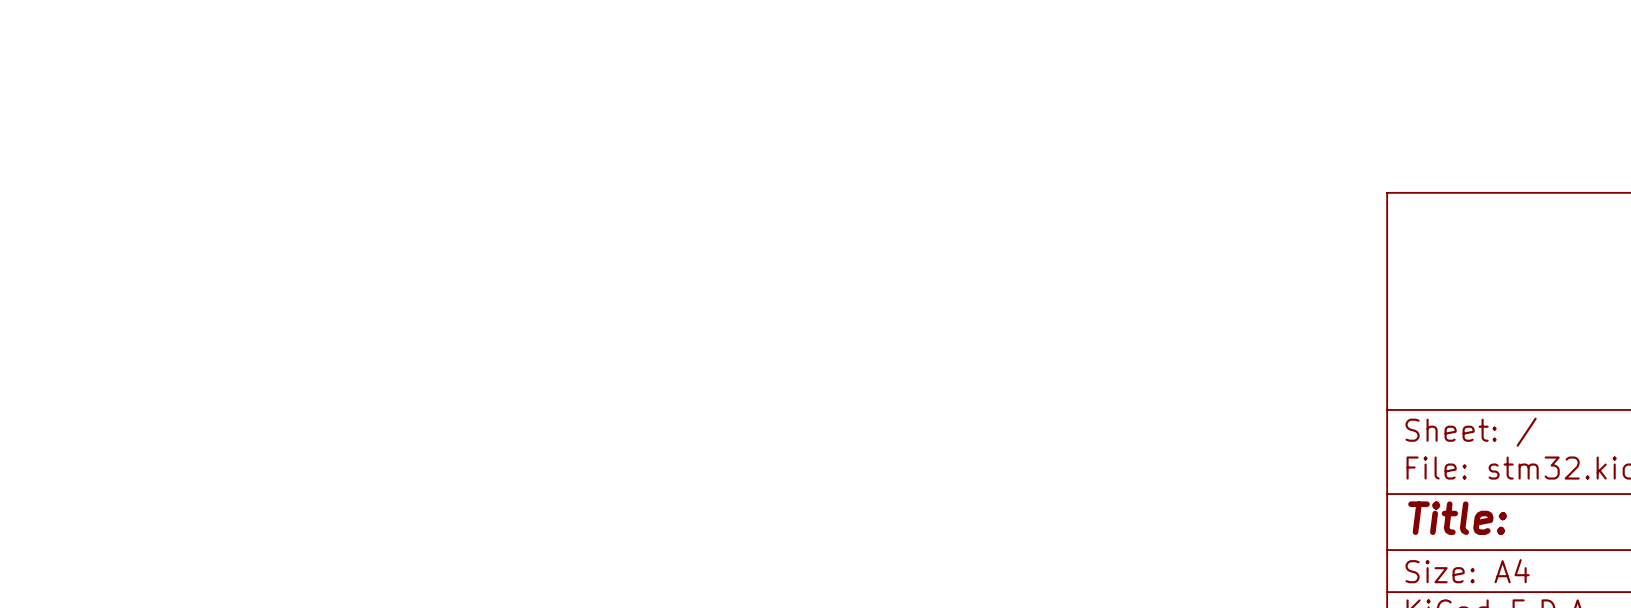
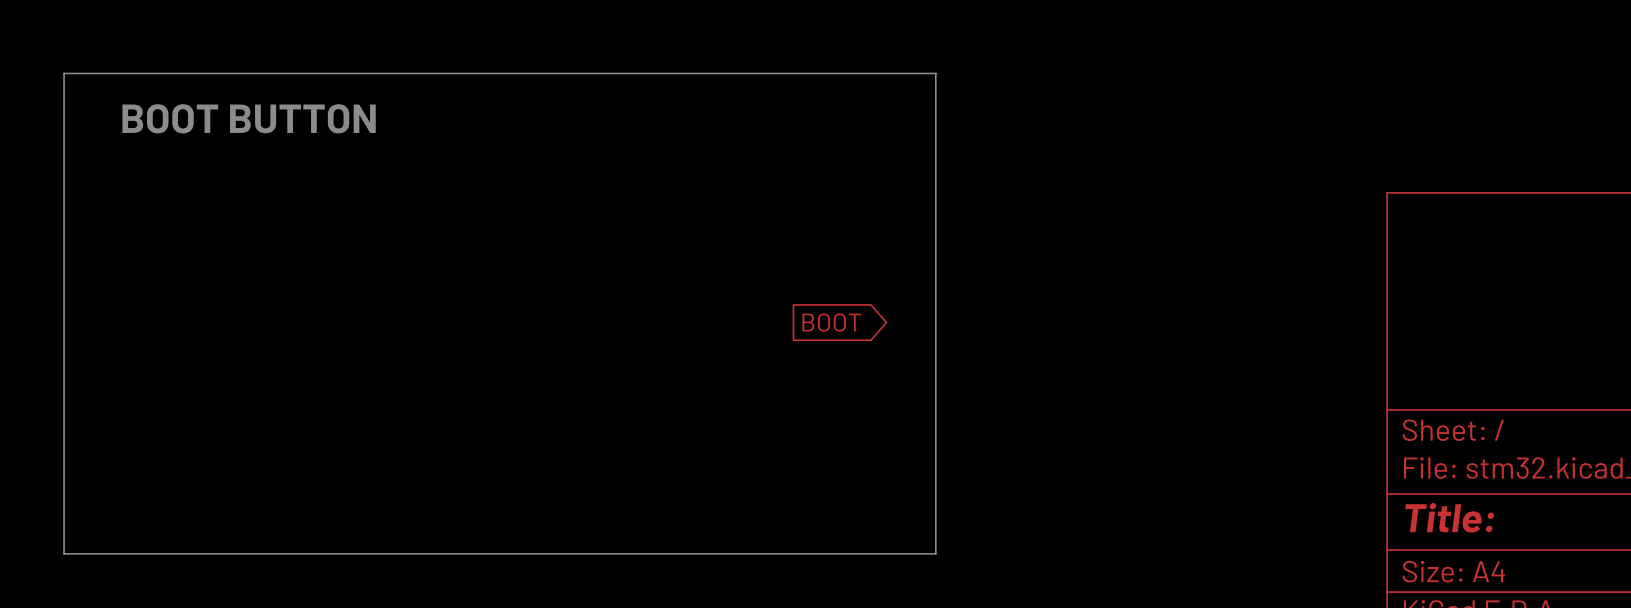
line: none -> (64, 73) (935, 73) (935, 553) (64, 553) (64, 73)
text: none -> BOOT BUTTON (249, 118)
global label: none -> BOOT (831, 322)

